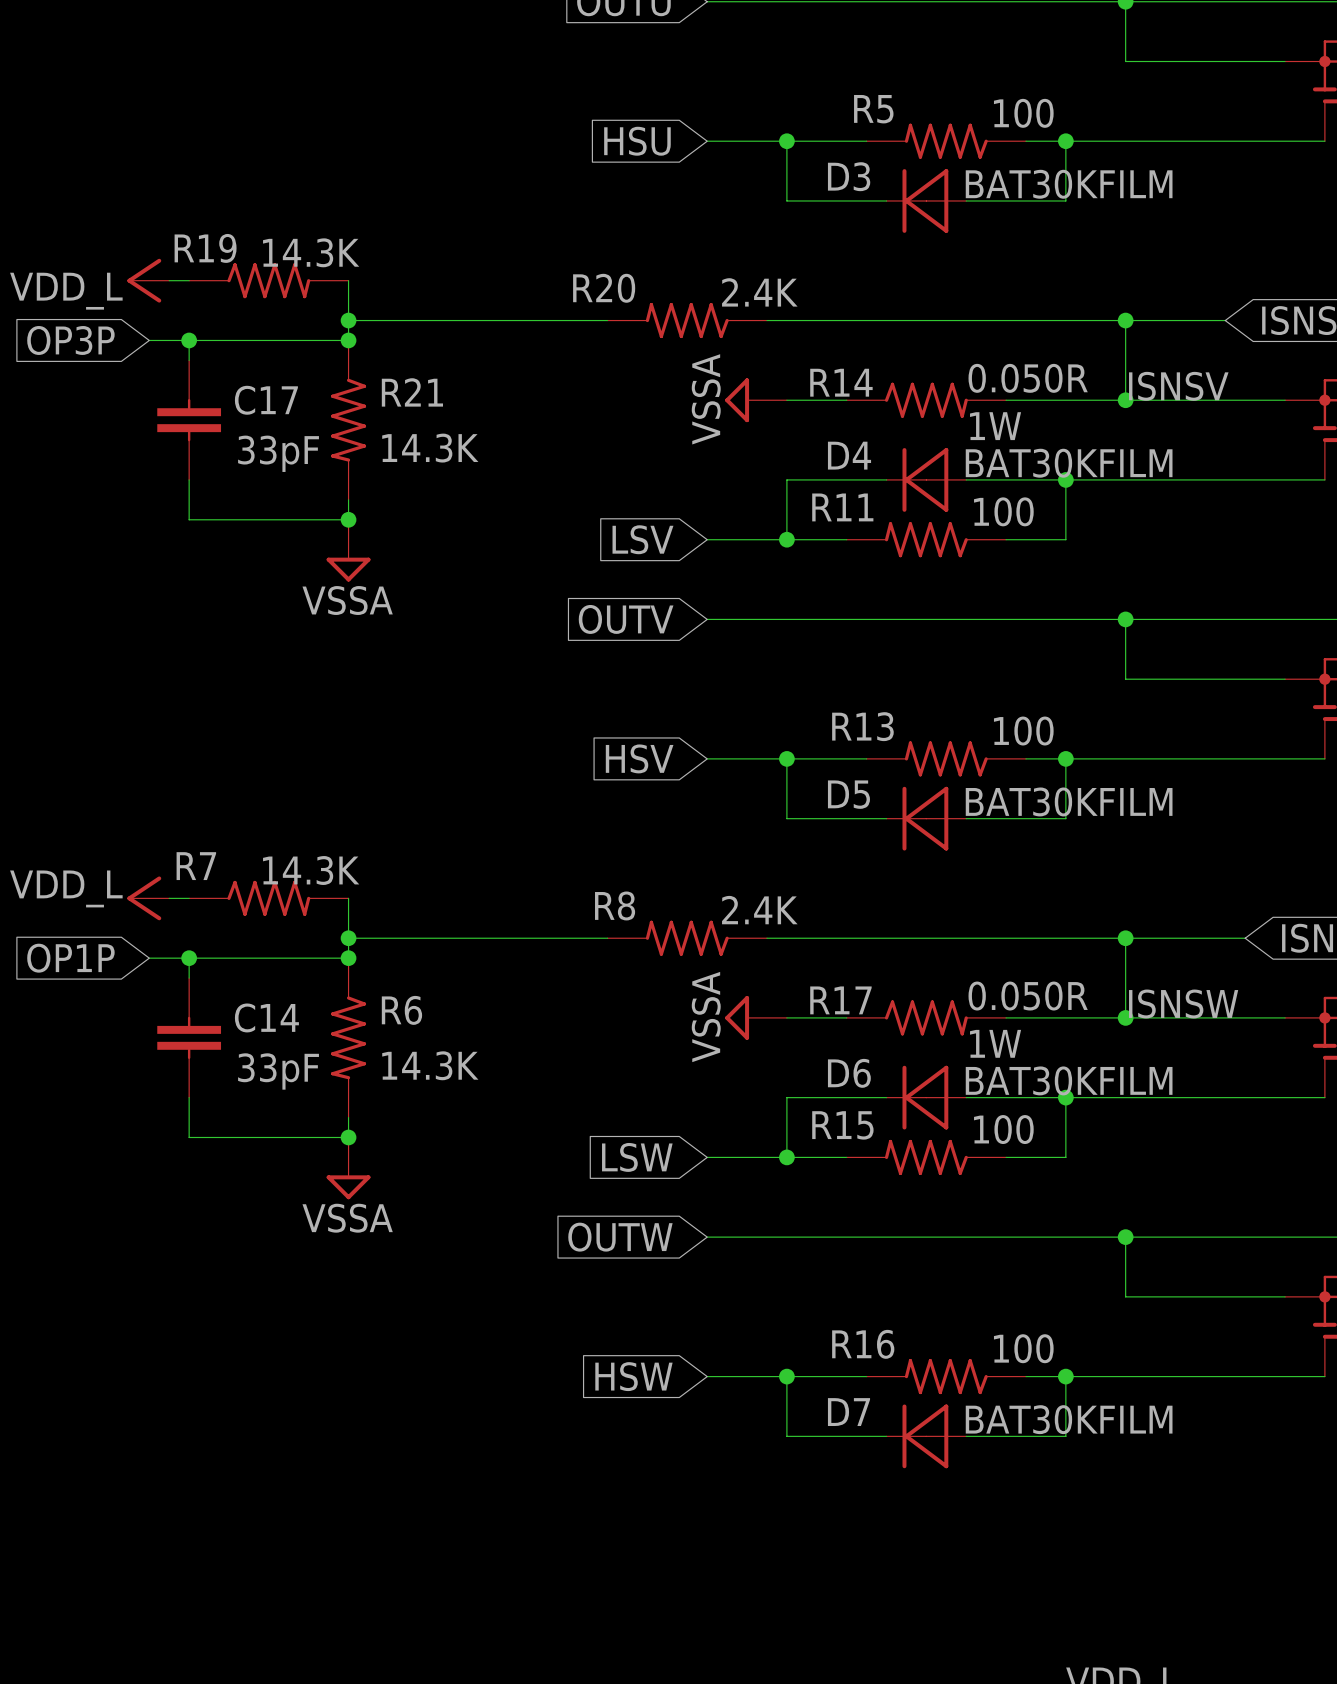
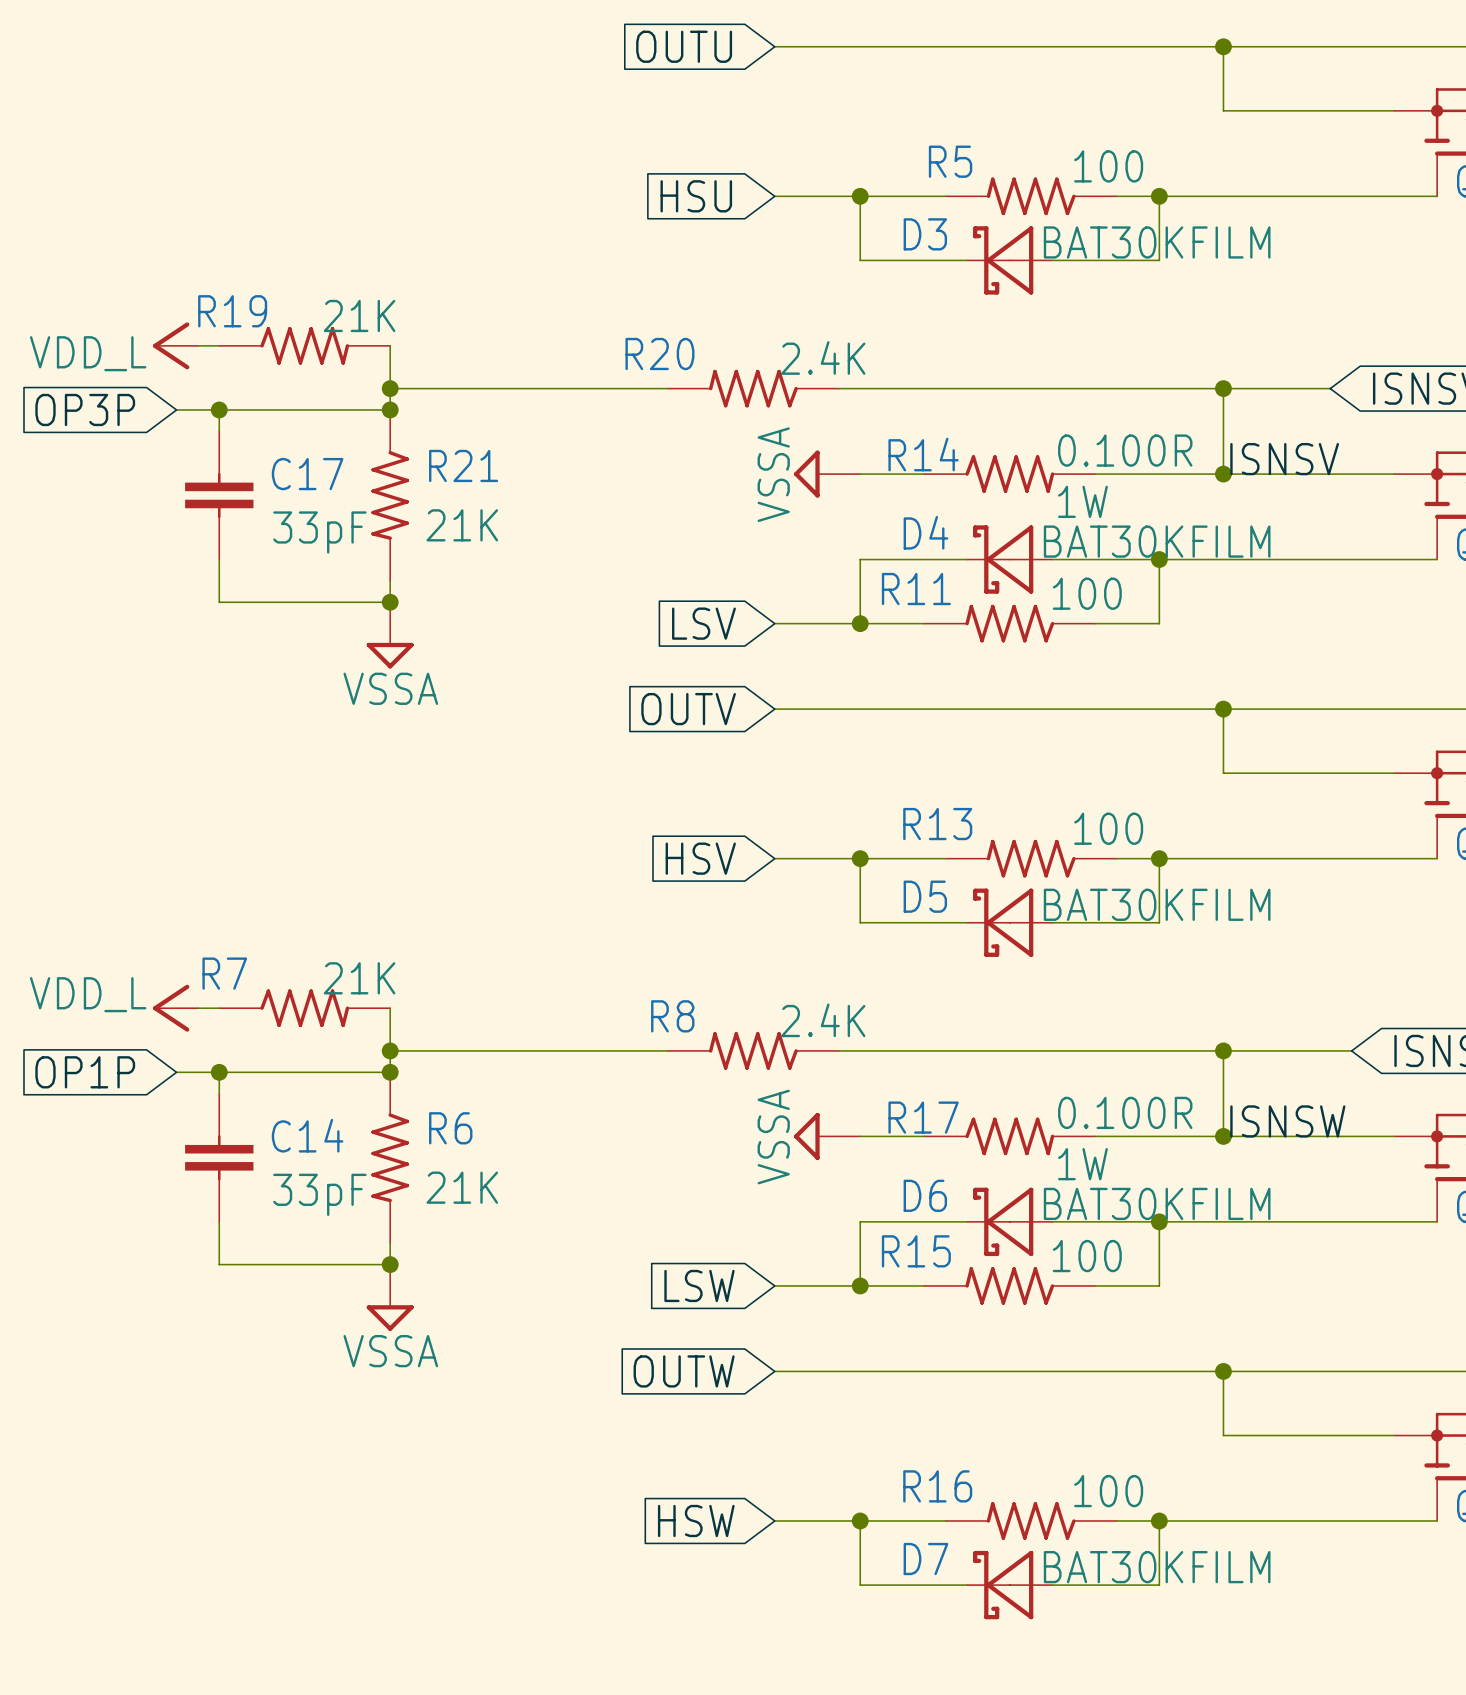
D3 symbol: [886, 169, 967, 233] -> [967, 226, 1053, 295]
R19 value: 14.3K (311, 252) -> 21K (359, 315)
R14 value: 0.050R (1028, 378) -> 0.100R (1125, 450)
R21 value: 14.3K (430, 448) -> 21K (462, 525)
D4 symbol: [886, 448, 967, 512] -> [967, 525, 1053, 594]
D5 symbol: [886, 786, 967, 851] -> [967, 888, 1053, 957]
R7 value: 14.3K (311, 870) -> 21K (359, 978)
R17 value: 0.050R (1028, 996) -> 0.100R (1125, 1112)
R6 value: 14.3K (430, 1065) -> 21K (462, 1187)
D6 symbol: [886, 1065, 967, 1130] -> [967, 1187, 1053, 1257]
D7 symbol: [886, 1404, 967, 1469] -> [967, 1550, 1053, 1620]

